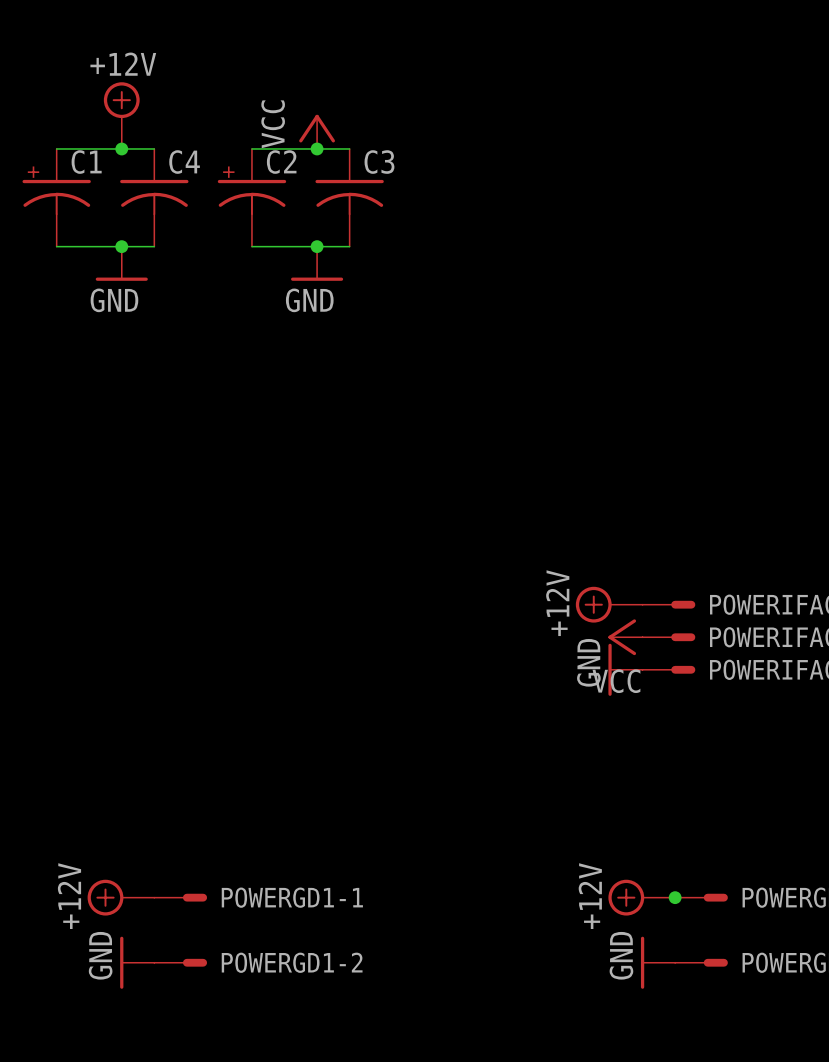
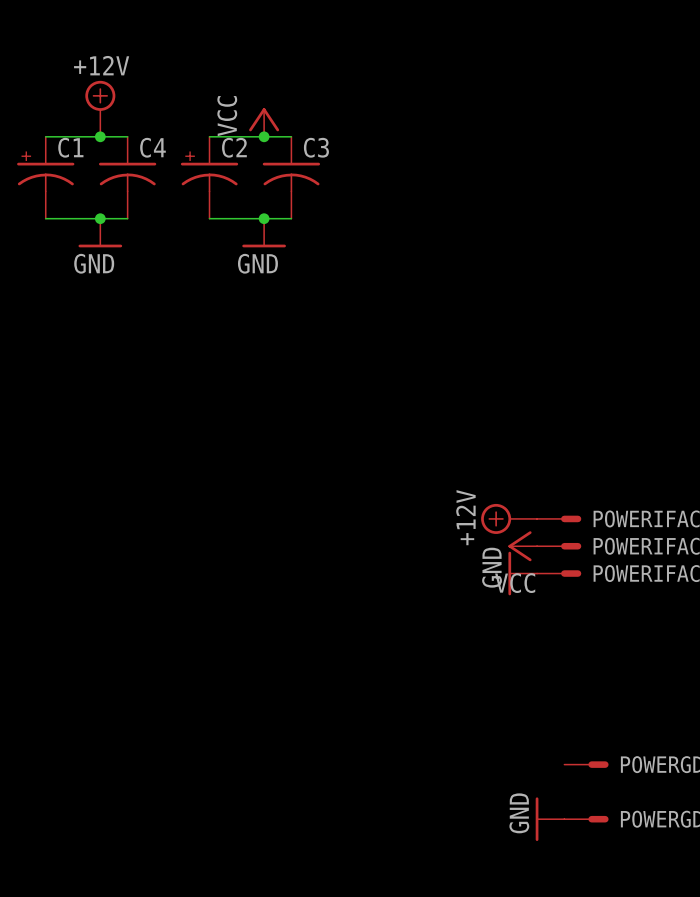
power symbol: +12V (120, 897) -> none
POWERGD1-1: (180, 897) -> none
power symbol: +12V (641, 897) -> none
junction: (675, 897) -> none
power symbol: GND (137, 962) -> none
POWERGD1-2: (180, 962) -> none

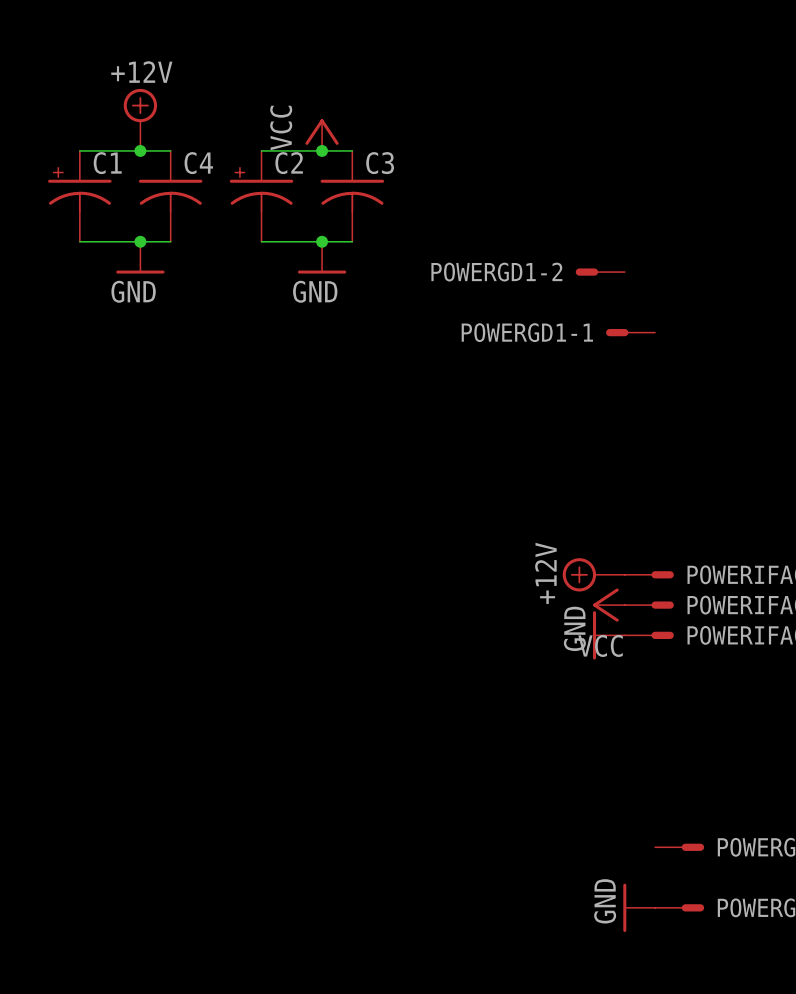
POWERGD1-2: none -> (600, 272)
POWERGD1-1: none -> (630, 332)

